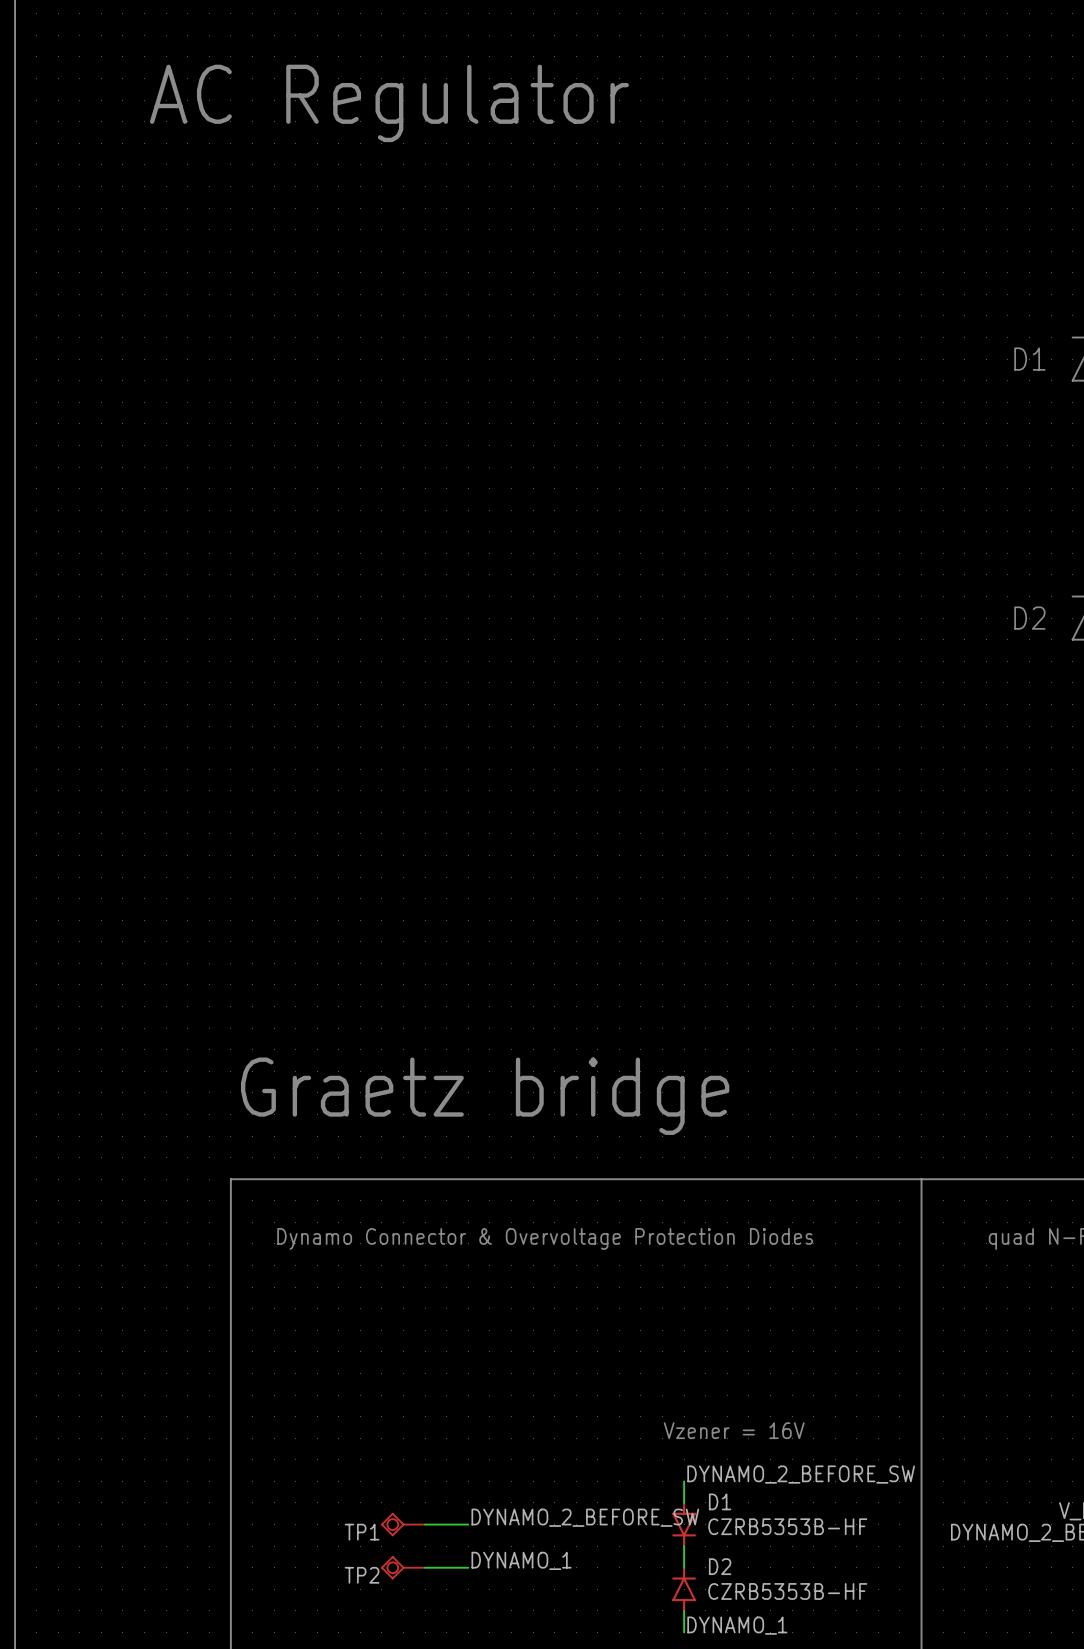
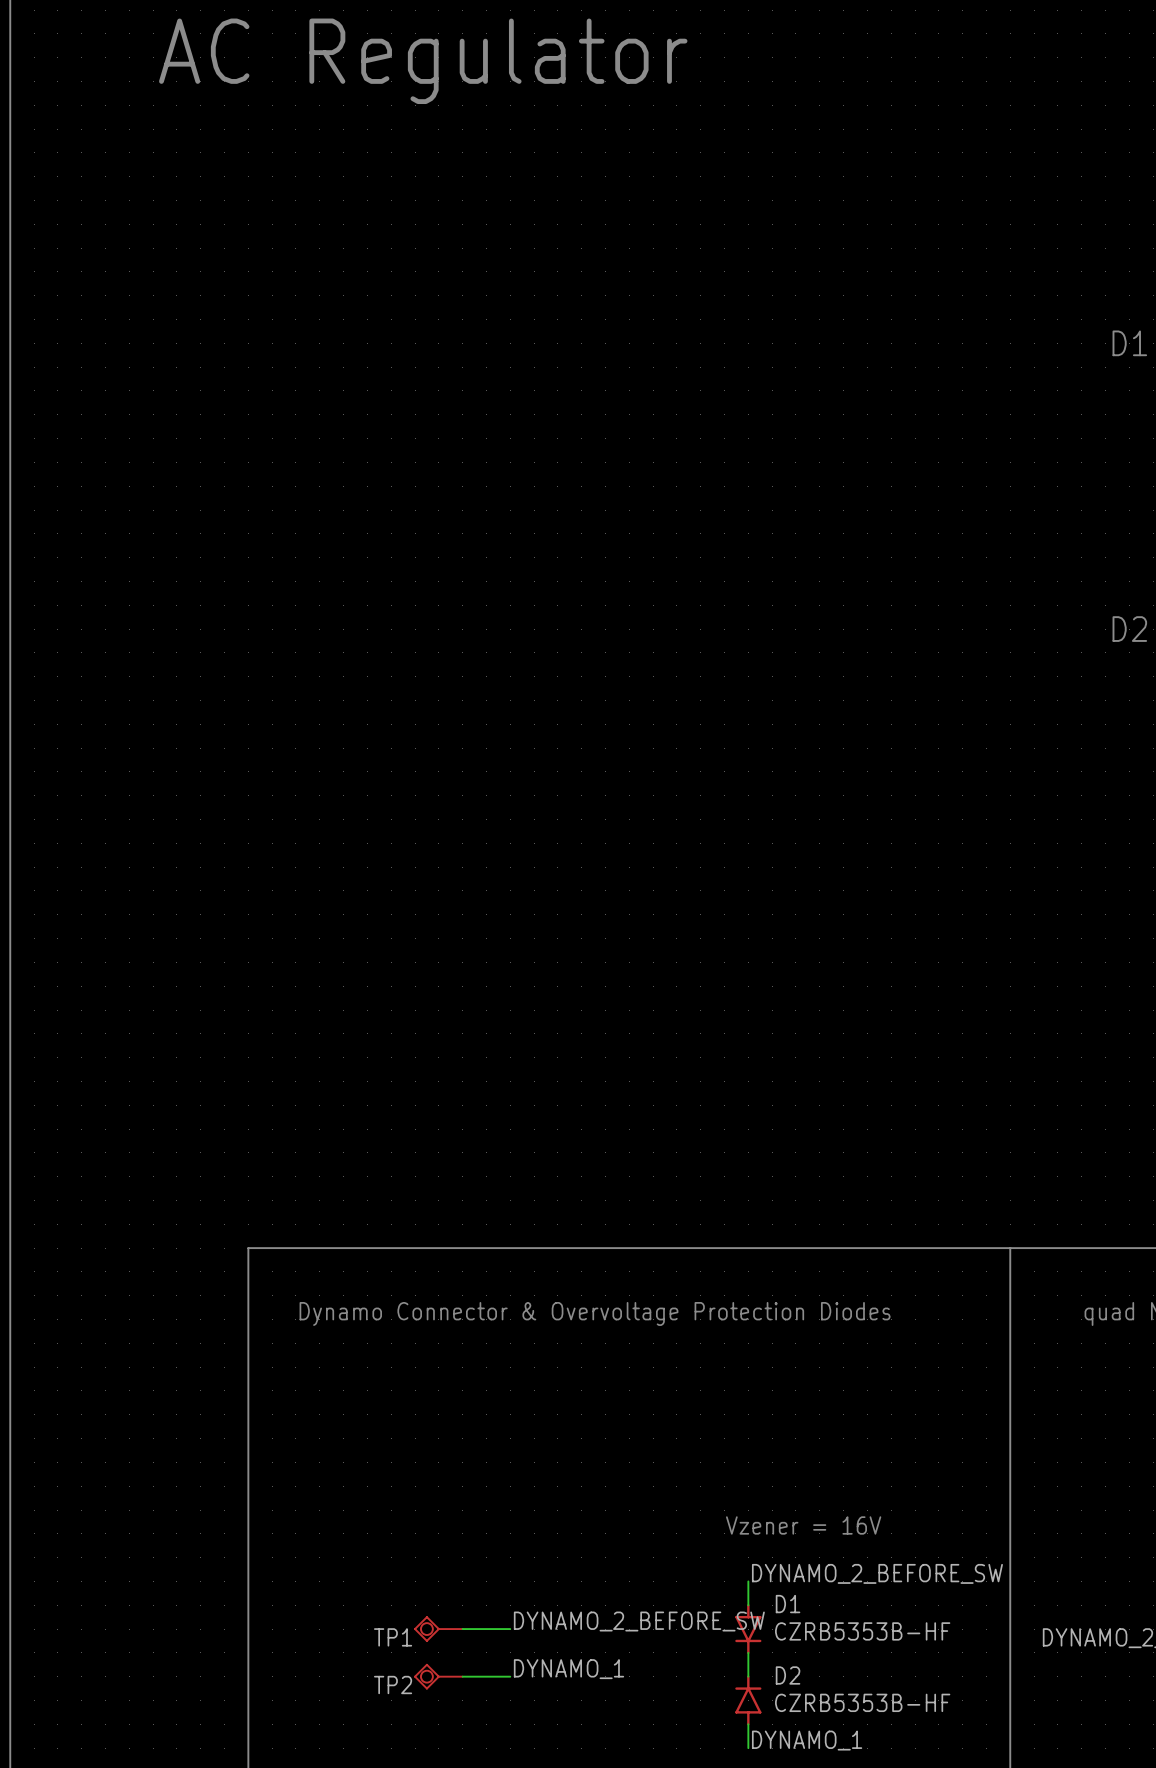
text: Graetz bridge (485, 1096) -> none

